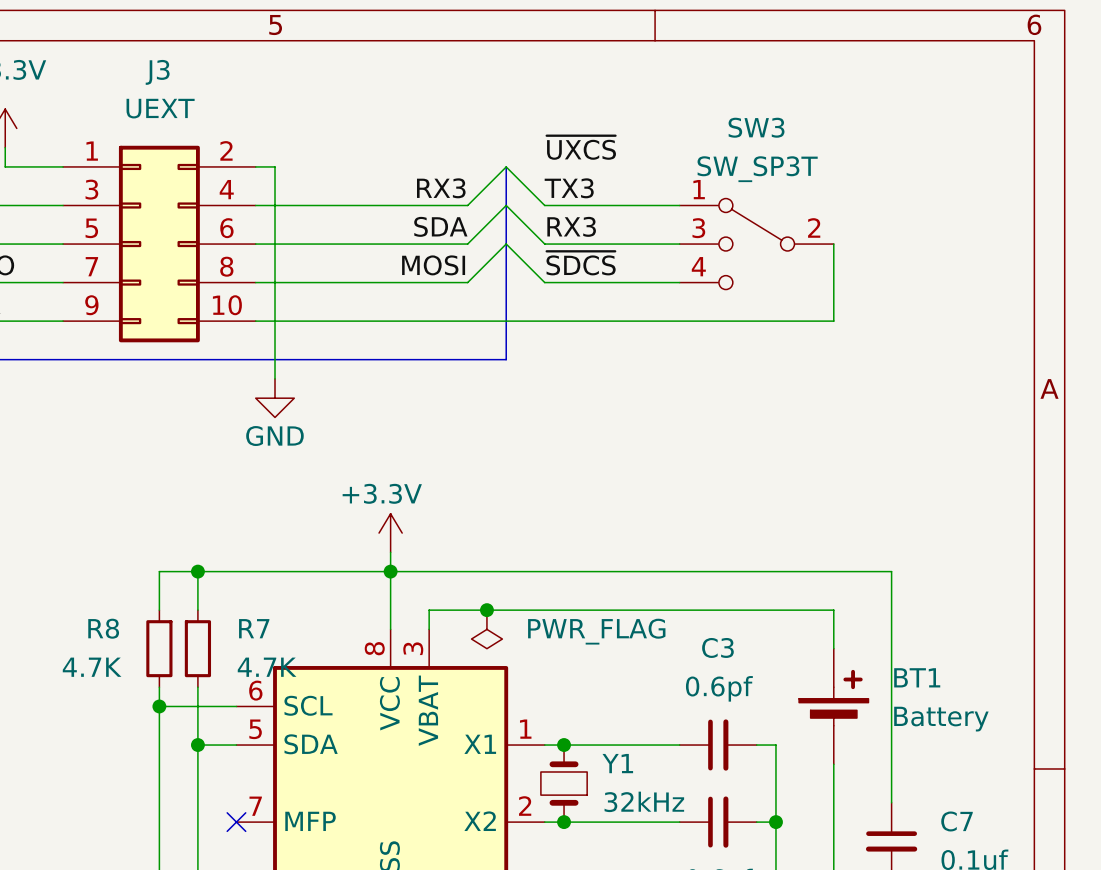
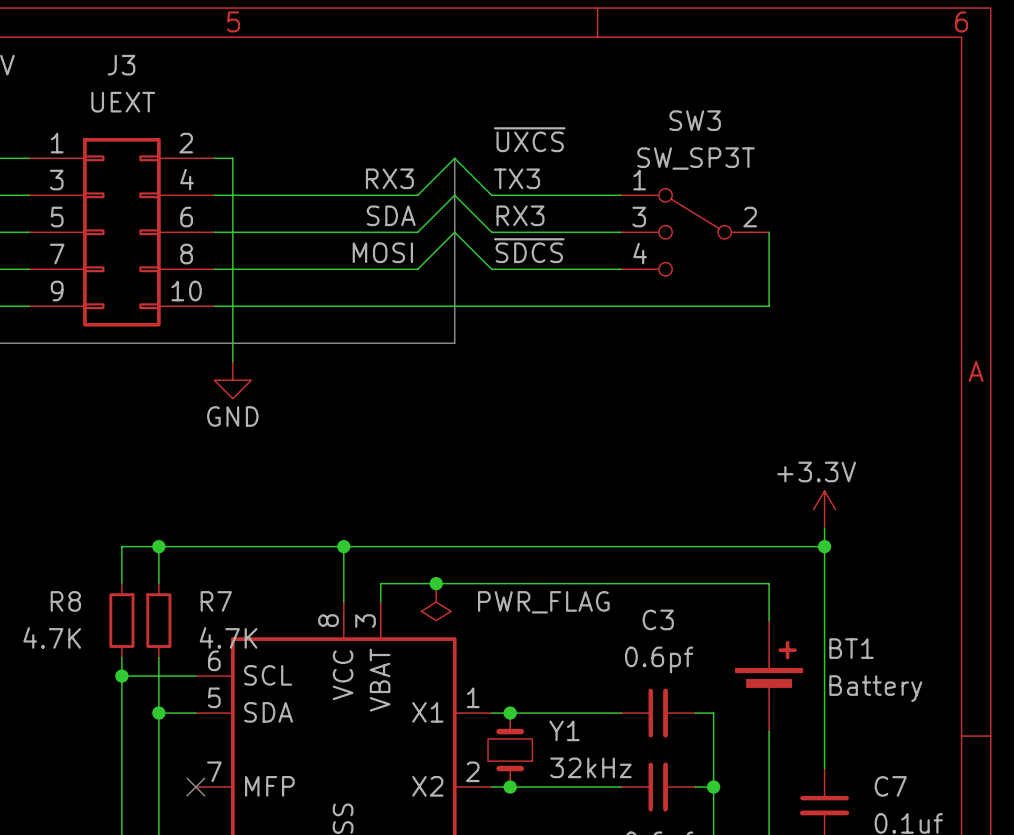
power symbol: +3.3V (390, 533) -> none
power symbol: none -> +3.3V (824, 509)
wire: (390, 552) (390, 571) -> none
wire: none -> (824, 528) (824, 546)
junction: none -> (824, 546)

